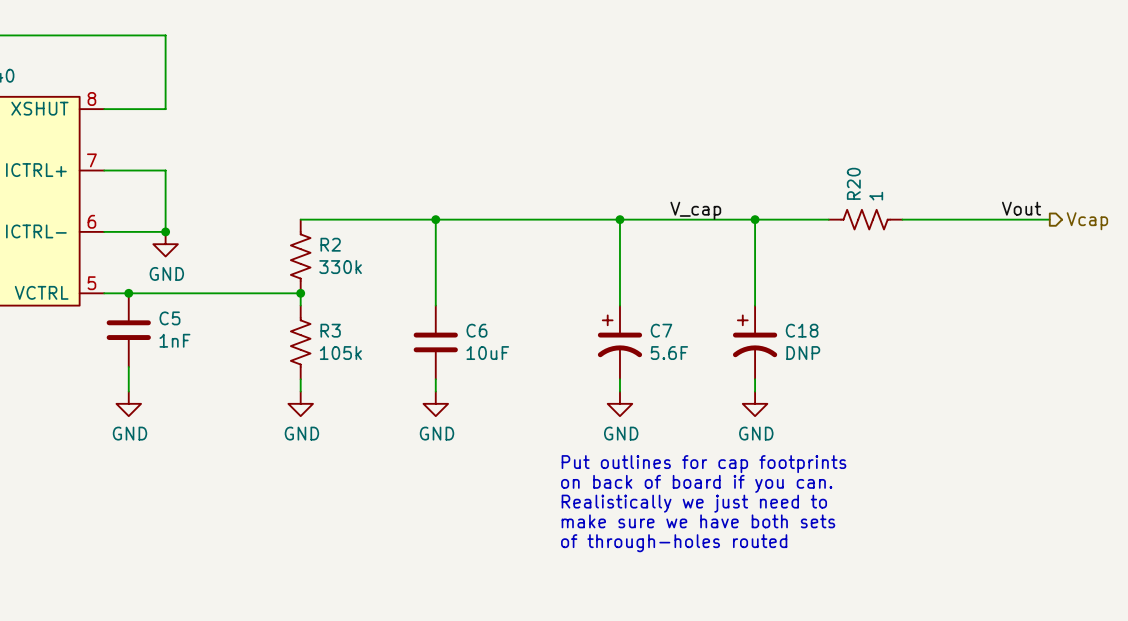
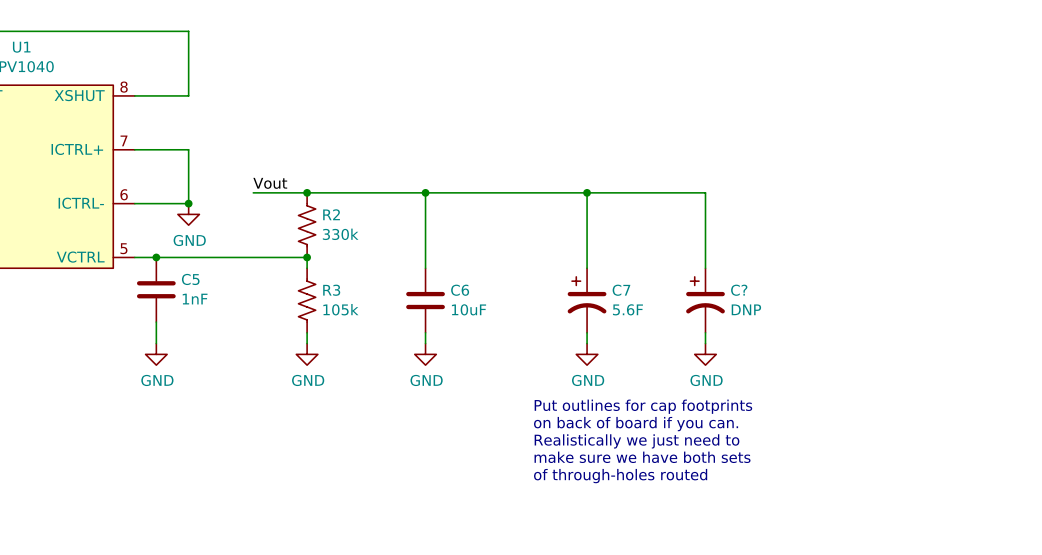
label: none -> Vout (270, 183)
label: Vout (1021, 208) -> none
label: V_cap (695, 210) -> none
wire: none -> (253, 192) (307, 192)
junction: none -> (307, 192)
wire: (755, 219) (828, 219) -> none
junction: (755, 219) -> none
R20: 1 (865, 219) -> none
wire: (902, 219) (1049, 219) -> none
hierarchical label: Vcap (1087, 221) -> none
C18 name: C18 (802, 330) -> C? (739, 290)

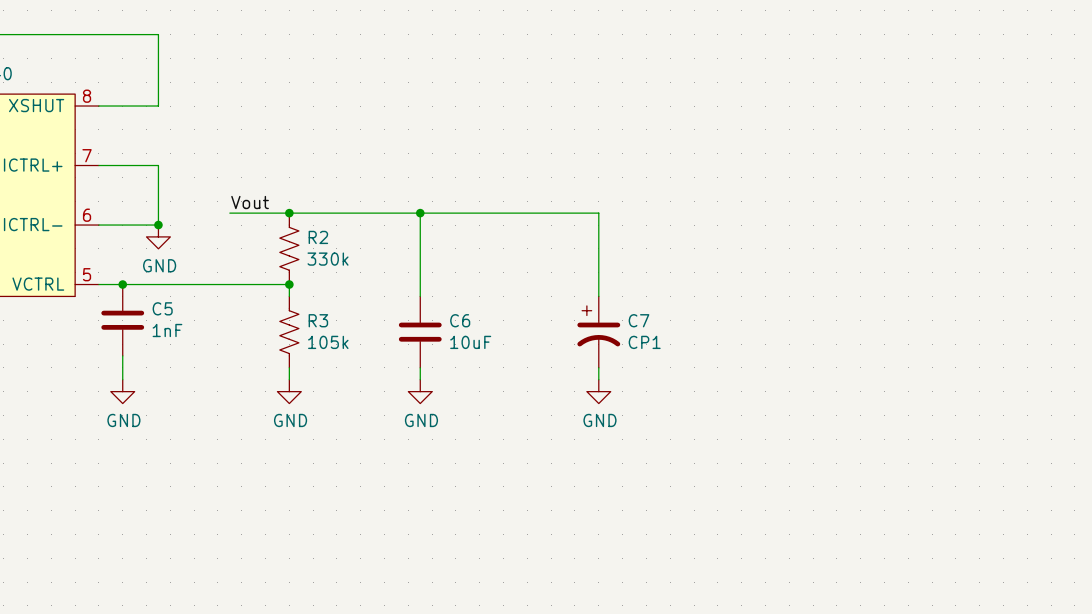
wire: (587, 192) (705, 192) (705, 268) -> none
junction: (587, 192) -> none
C?: DNP (705, 300) -> none
C7 value: 5.6F (627, 309) -> CP1 (644, 342)
wire: (705, 332) (705, 343) -> none
power symbol: GND (705, 354) -> none
text: Put outlines for cap footprints (643, 406) -> none
text: on back of board if you can. (636, 424) -> none
text: Realistically we just need to (637, 441) -> none
text: make sure we have both sets (642, 457) -> none
text: of through-holes routed (620, 476) -> none

